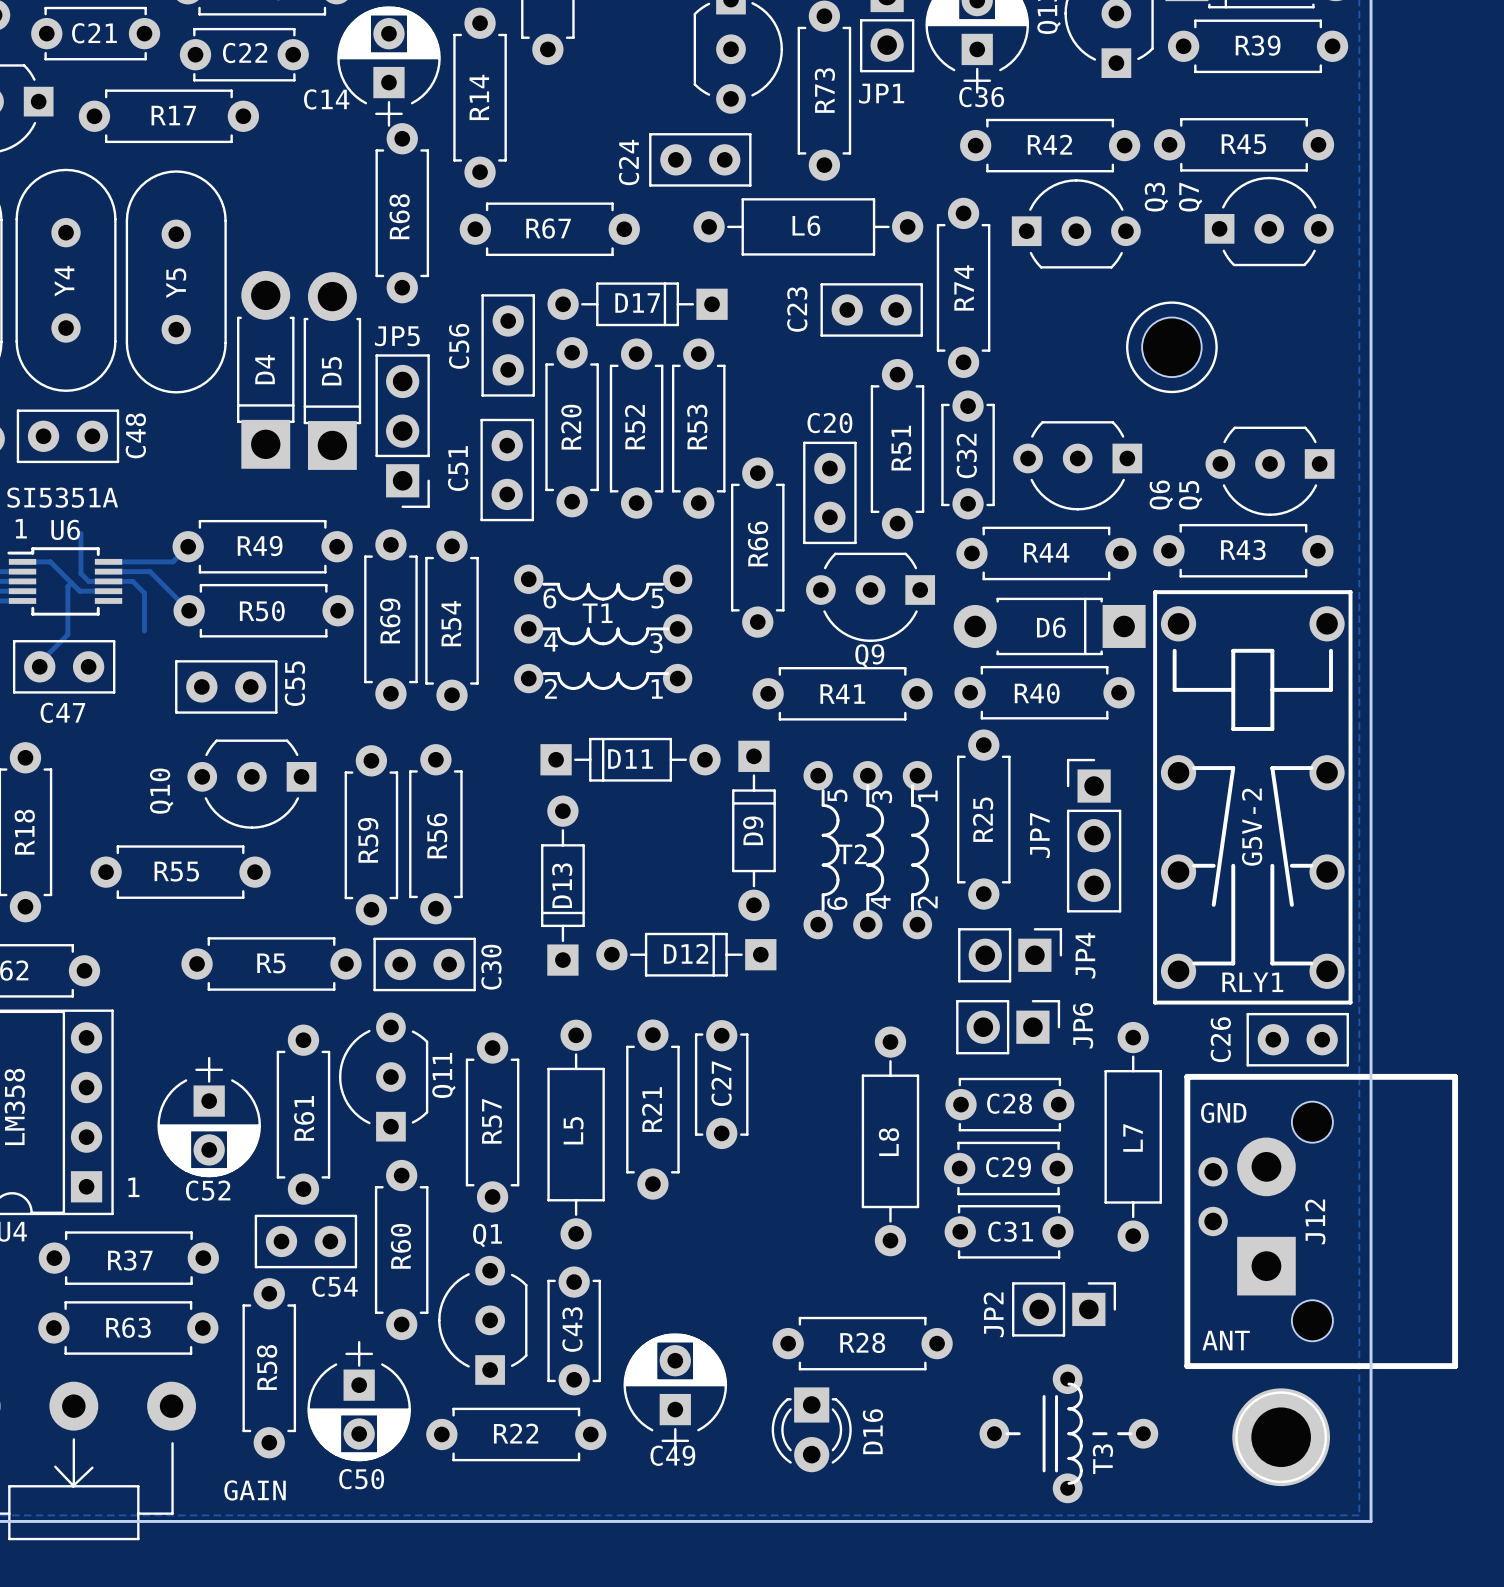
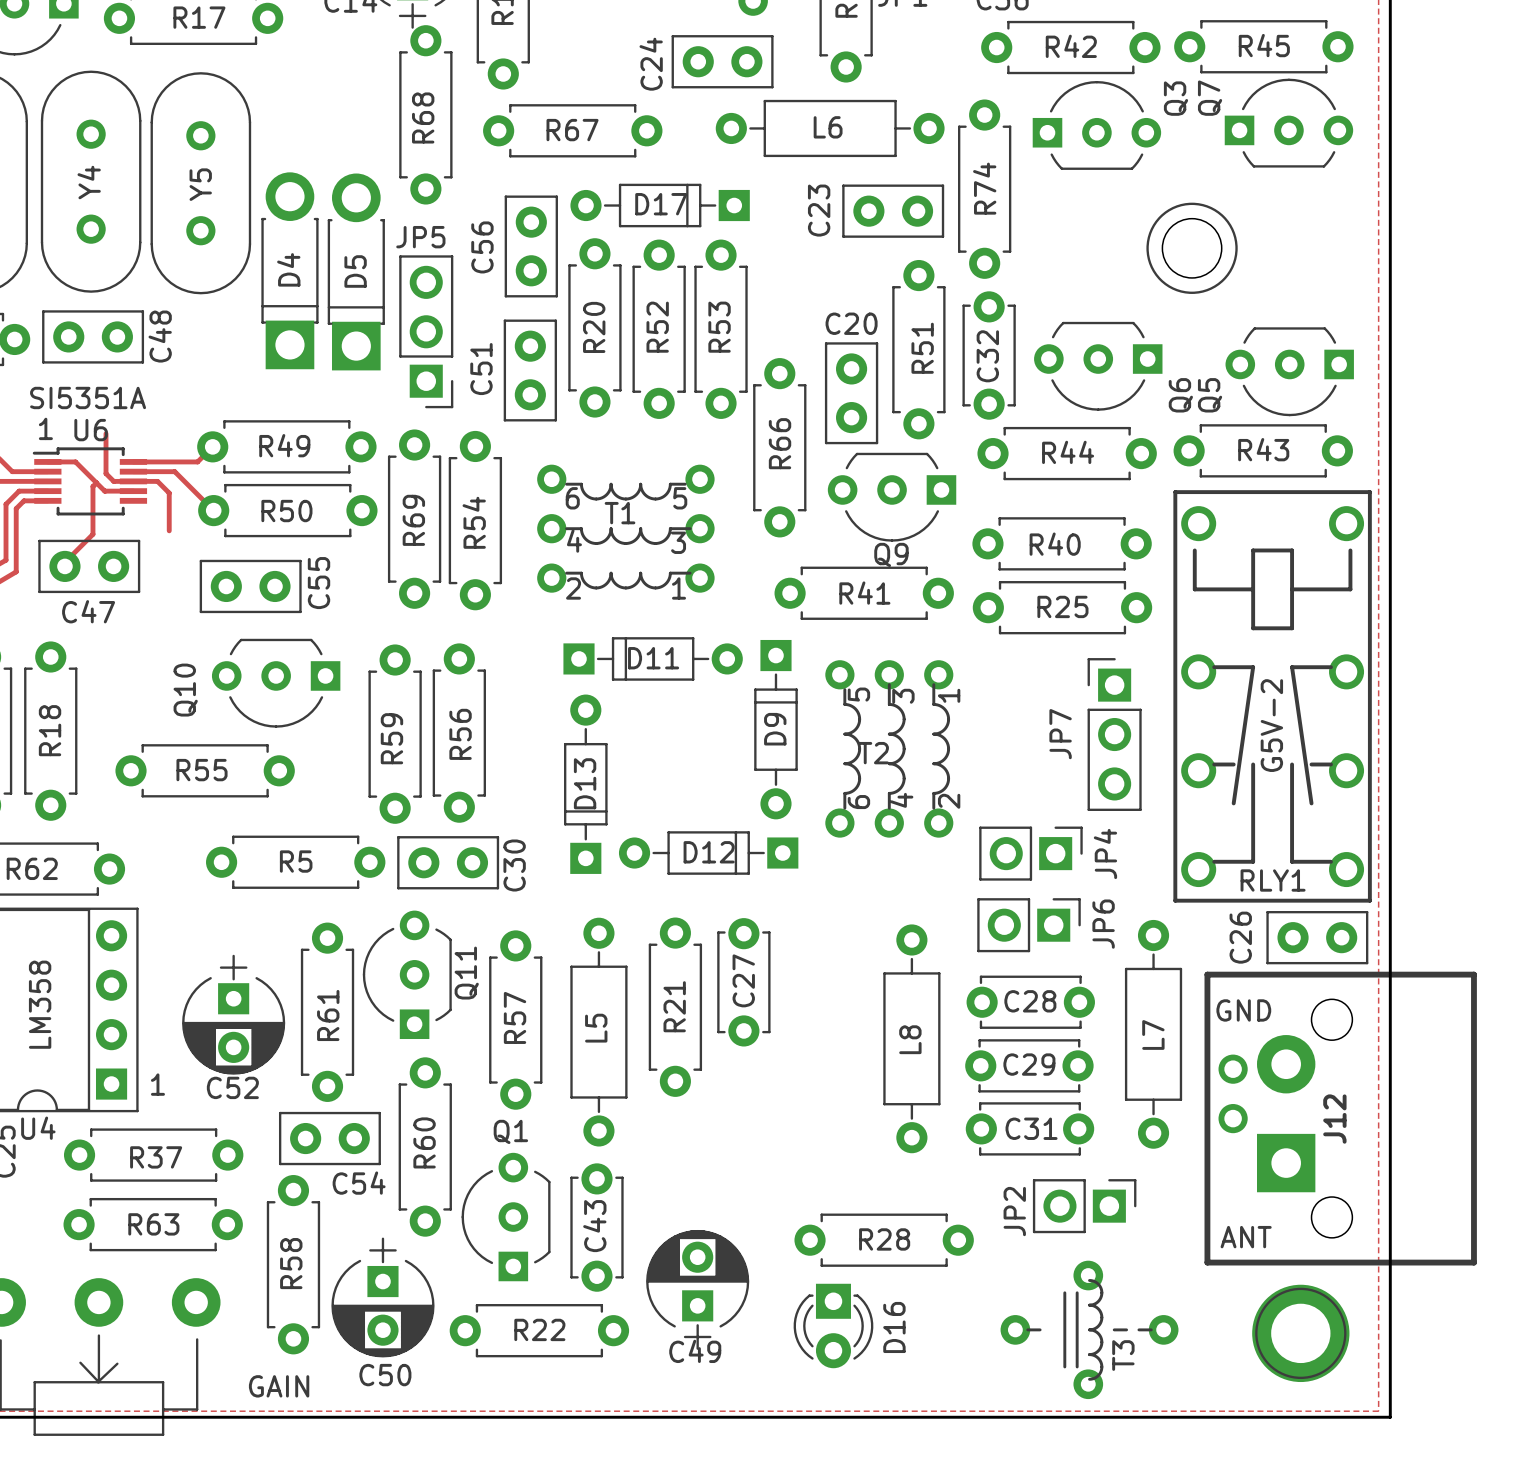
D6: (1049, 626) -> none
R40 position: (1044, 692) -> (1062, 543)
R25 rotation: 0° (983, 819) -> 90° clockwise (1062, 607)
R25 position: (983, 819) -> (1062, 607)

